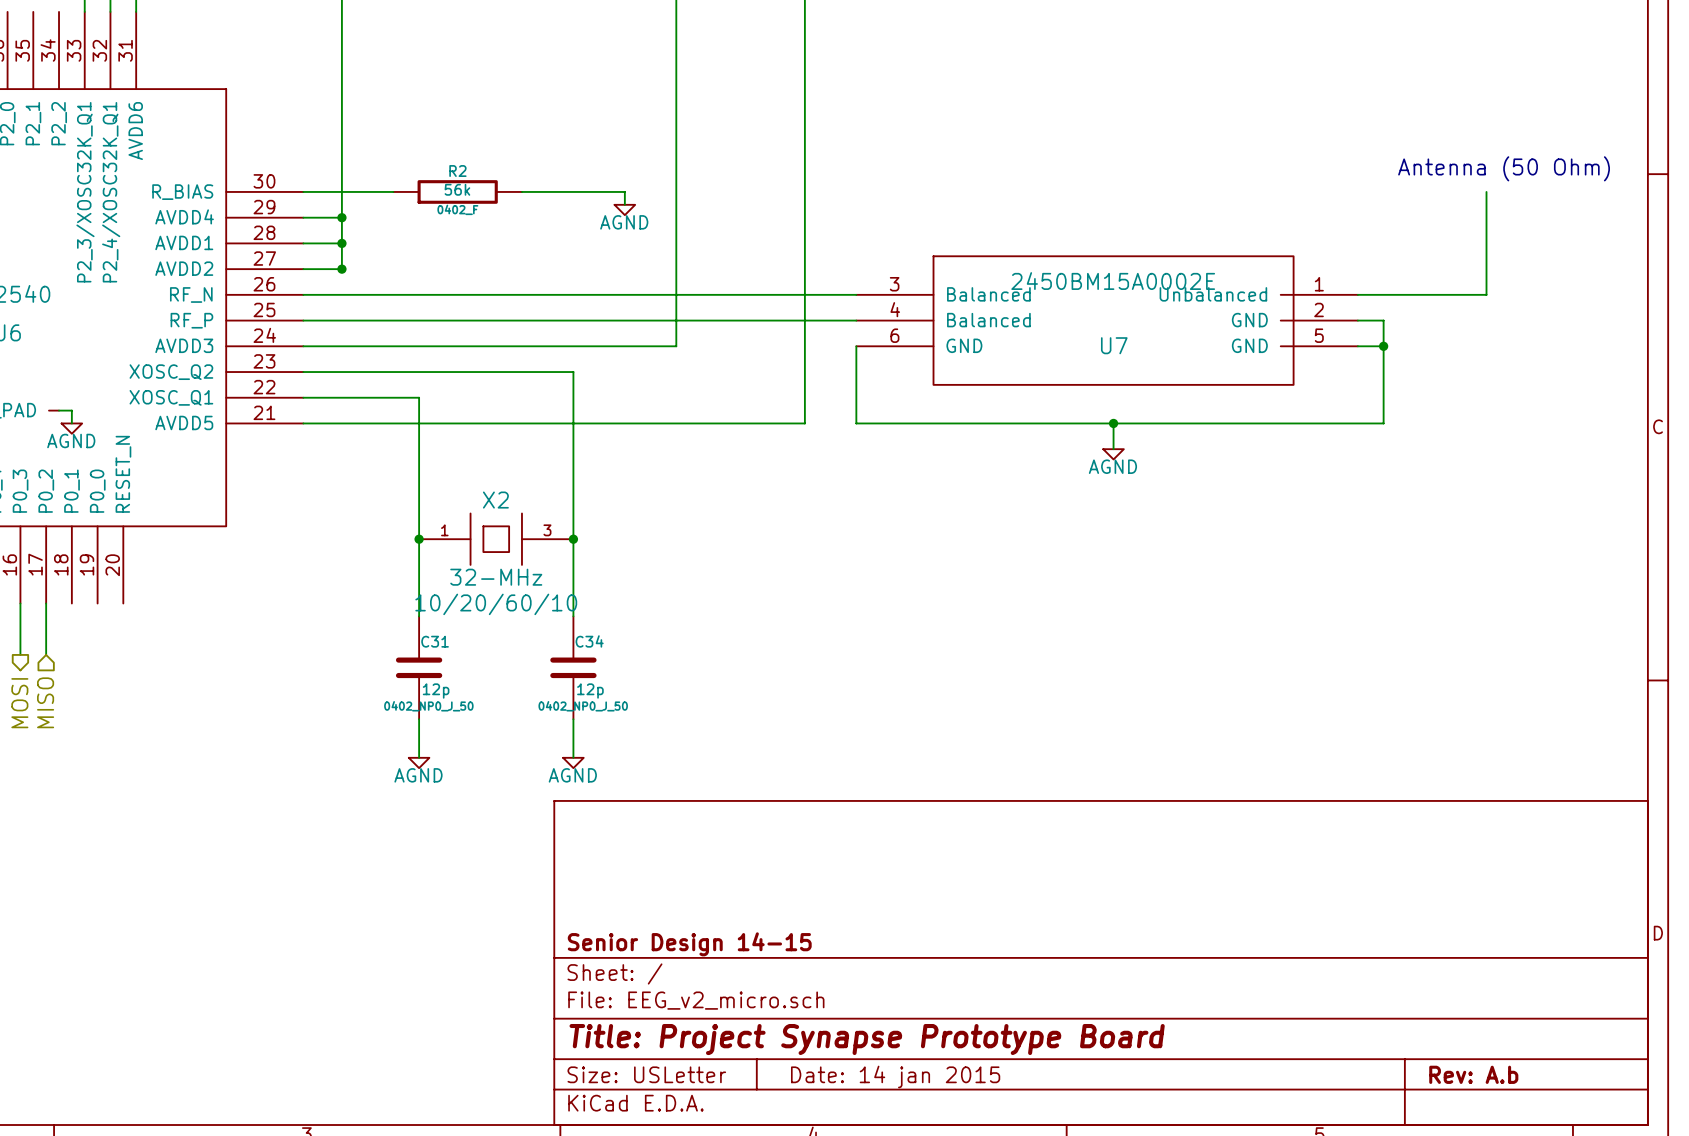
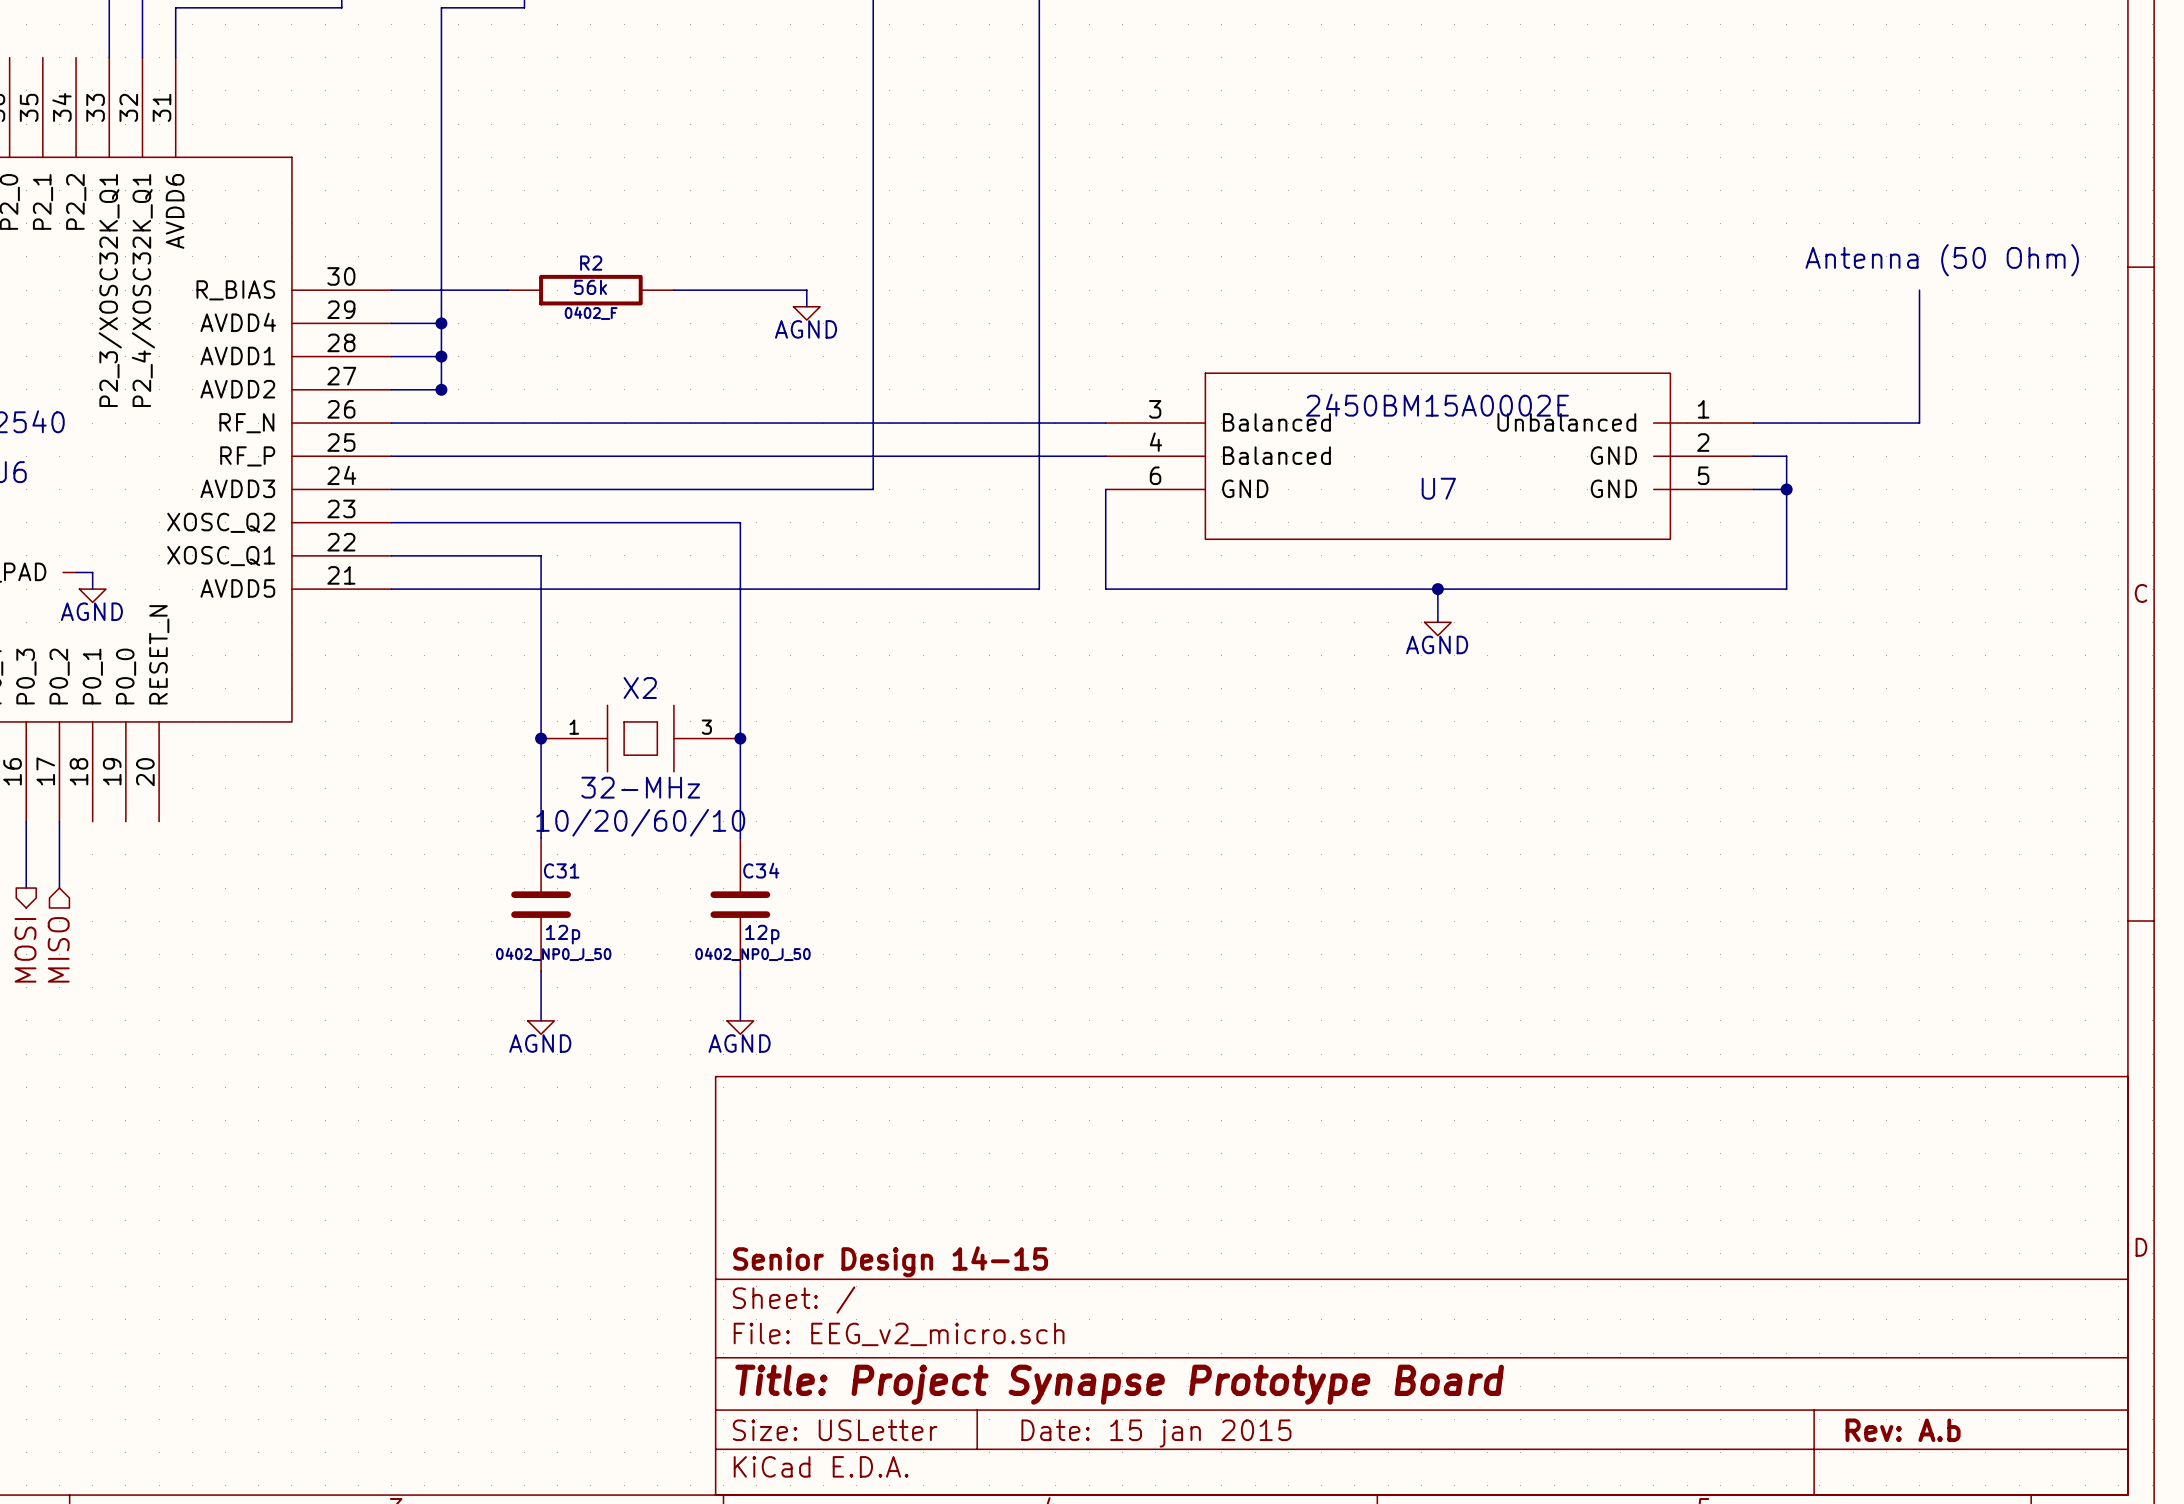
title block: Date: 14 jan 2015 (895, 1076) -> Date: 15 jan 2015 (1156, 1433)

